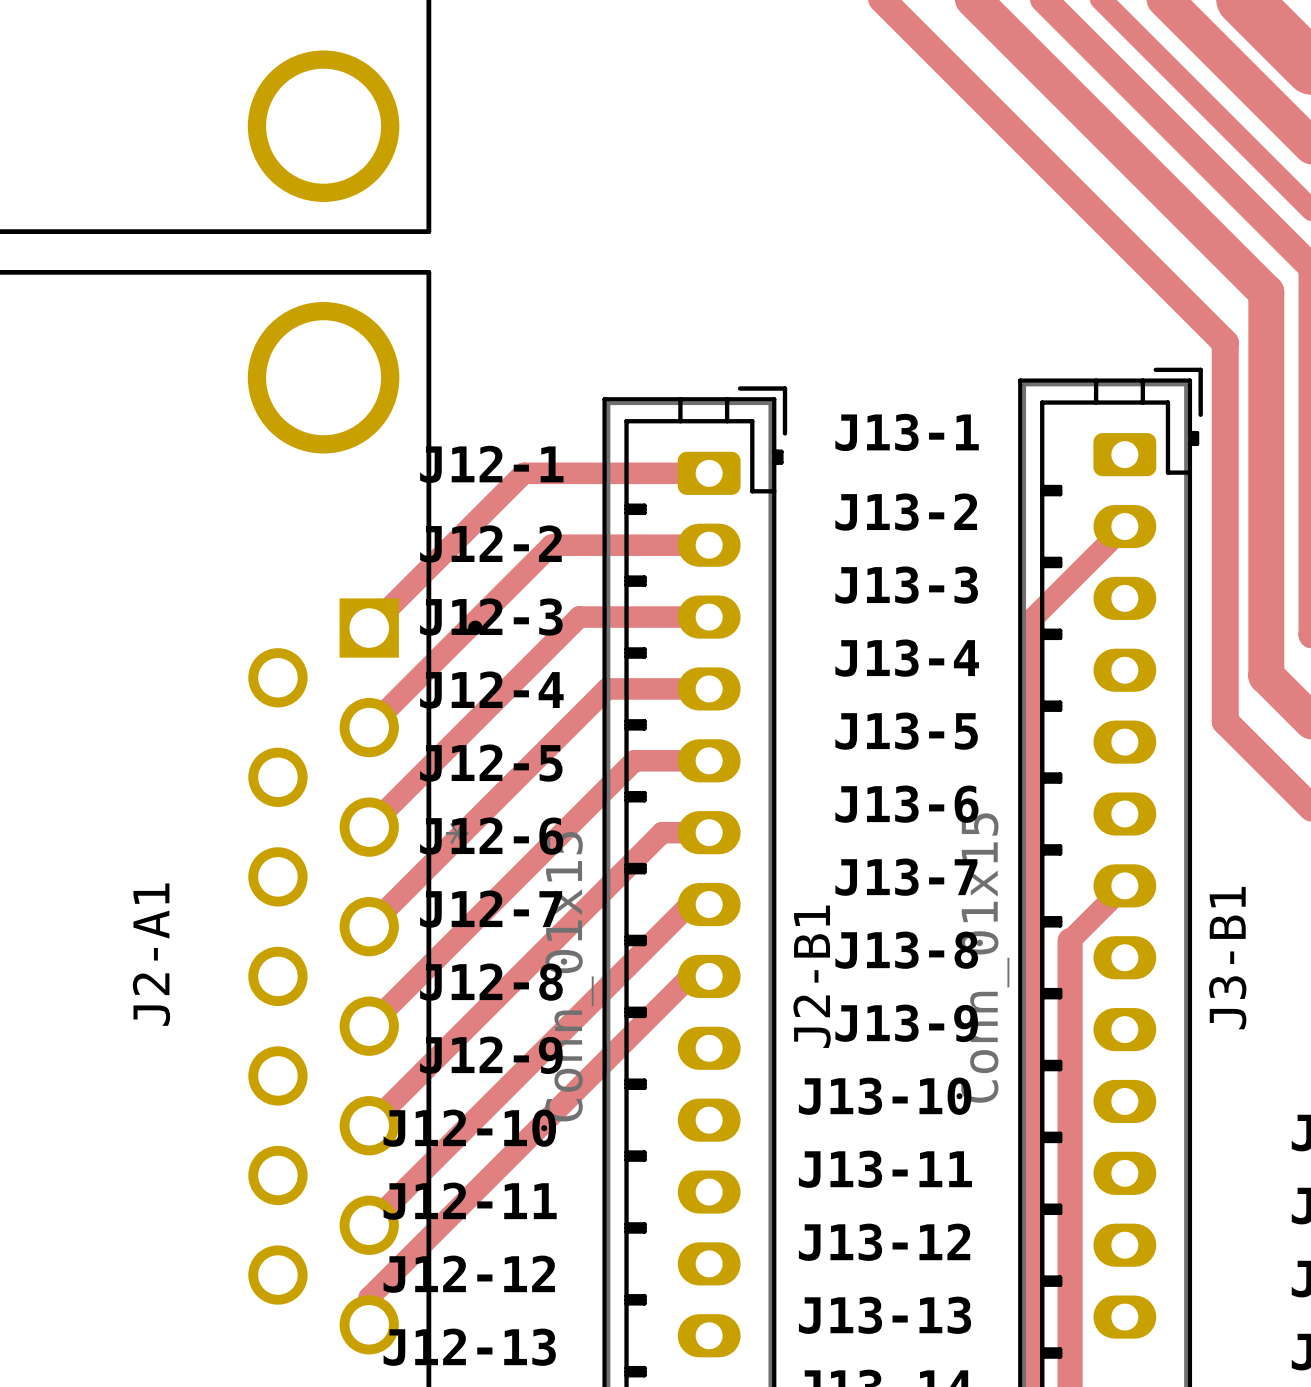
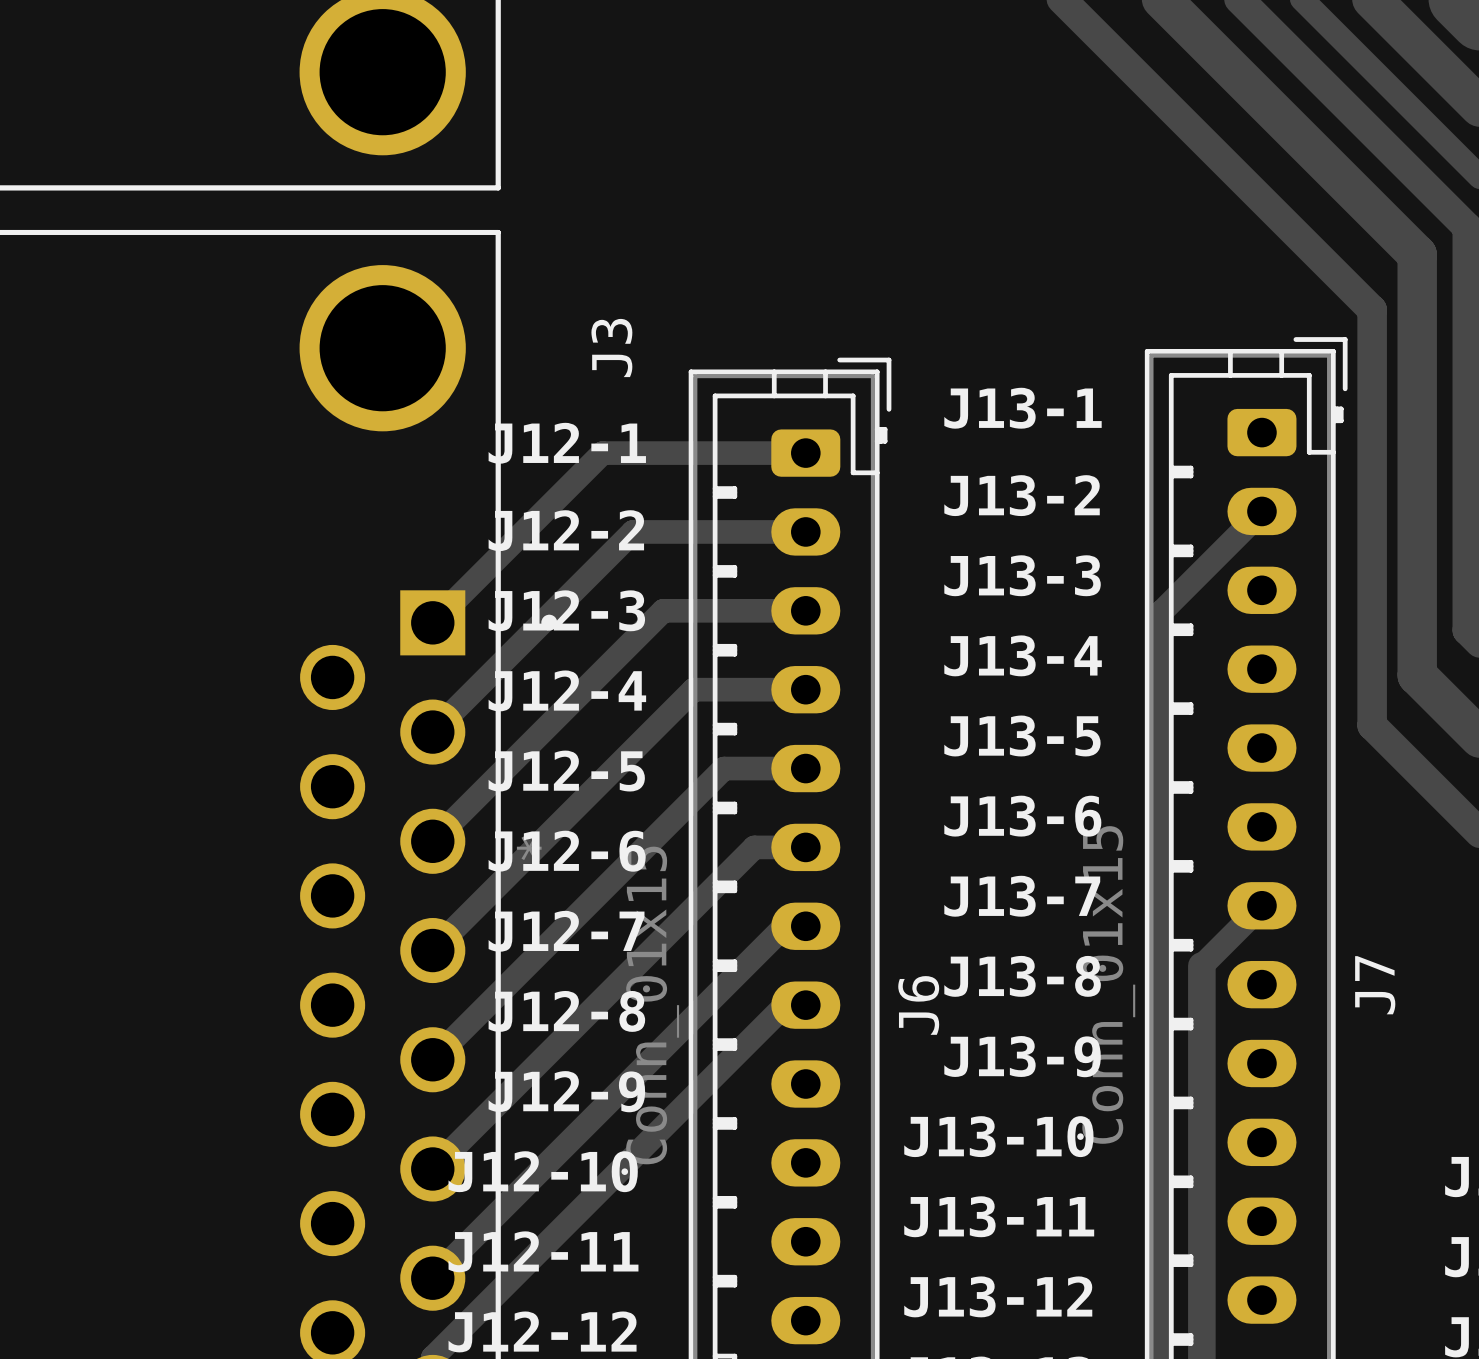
J2-A1 name: J2-A1 (151, 954) -> J3 (611, 348)
J3-B1 name: J3-B1 (1227, 958) -> J7 (1375, 985)
J2-B1 name: J2-B1 (812, 976) -> J6 (918, 1005)

